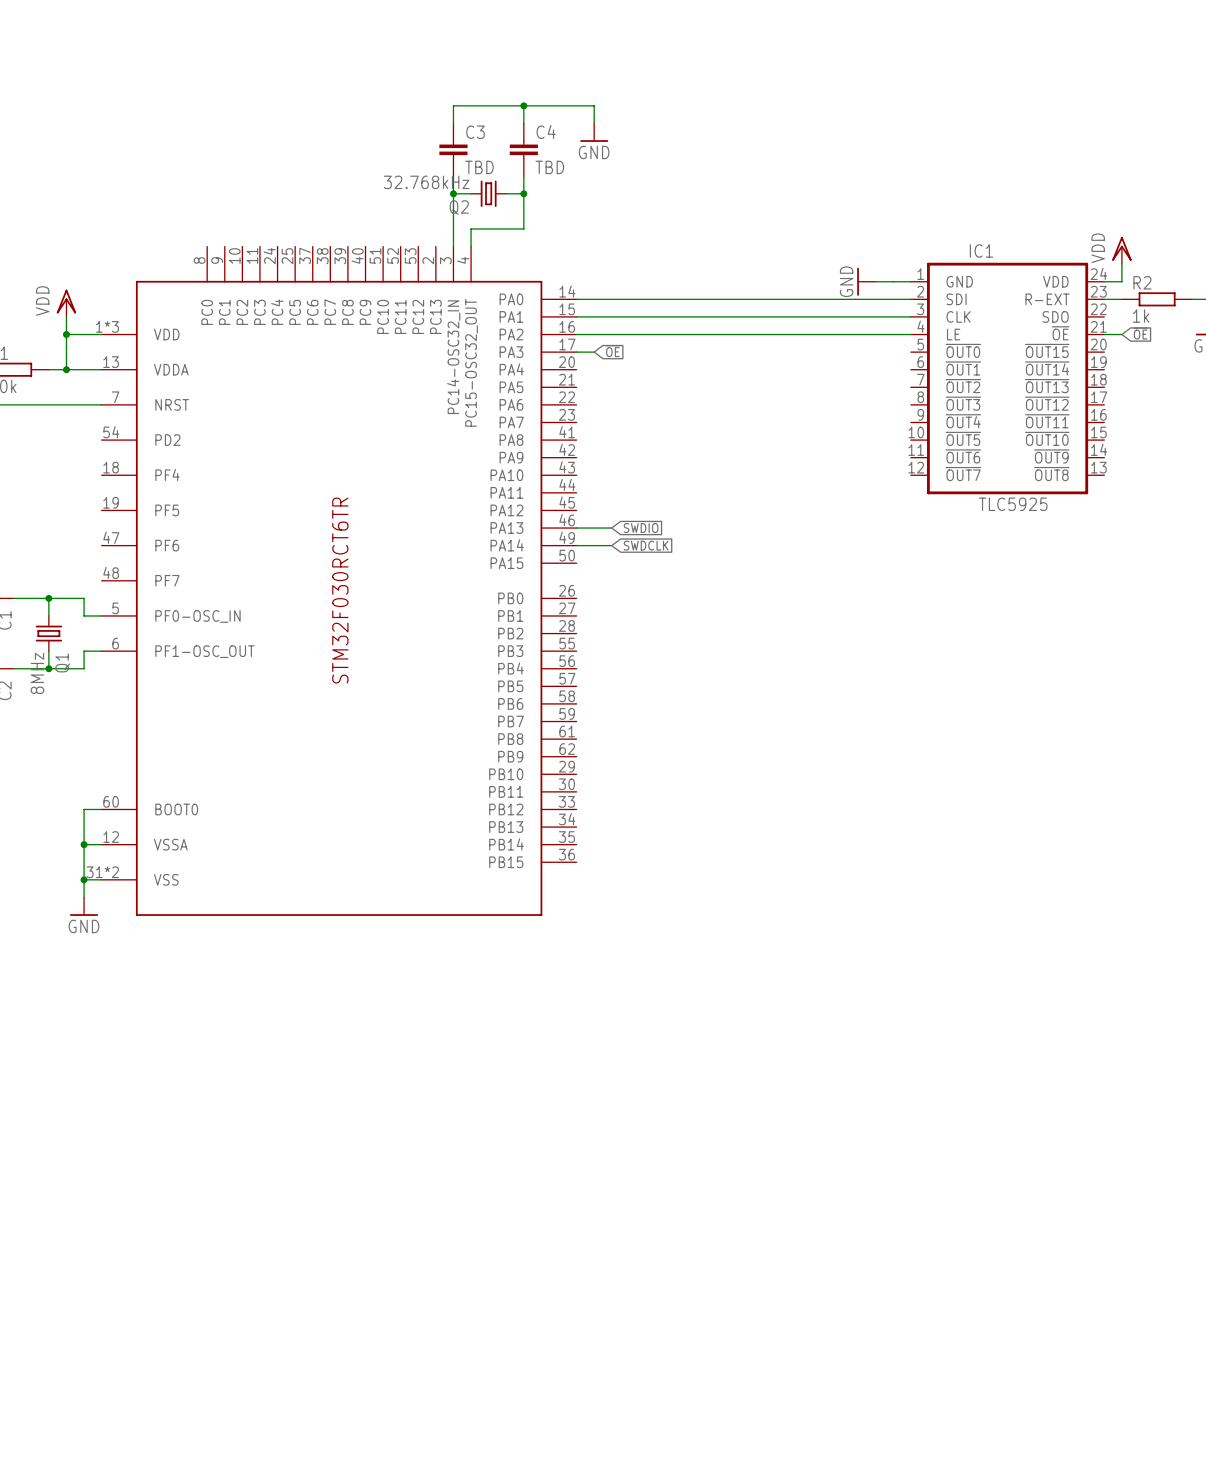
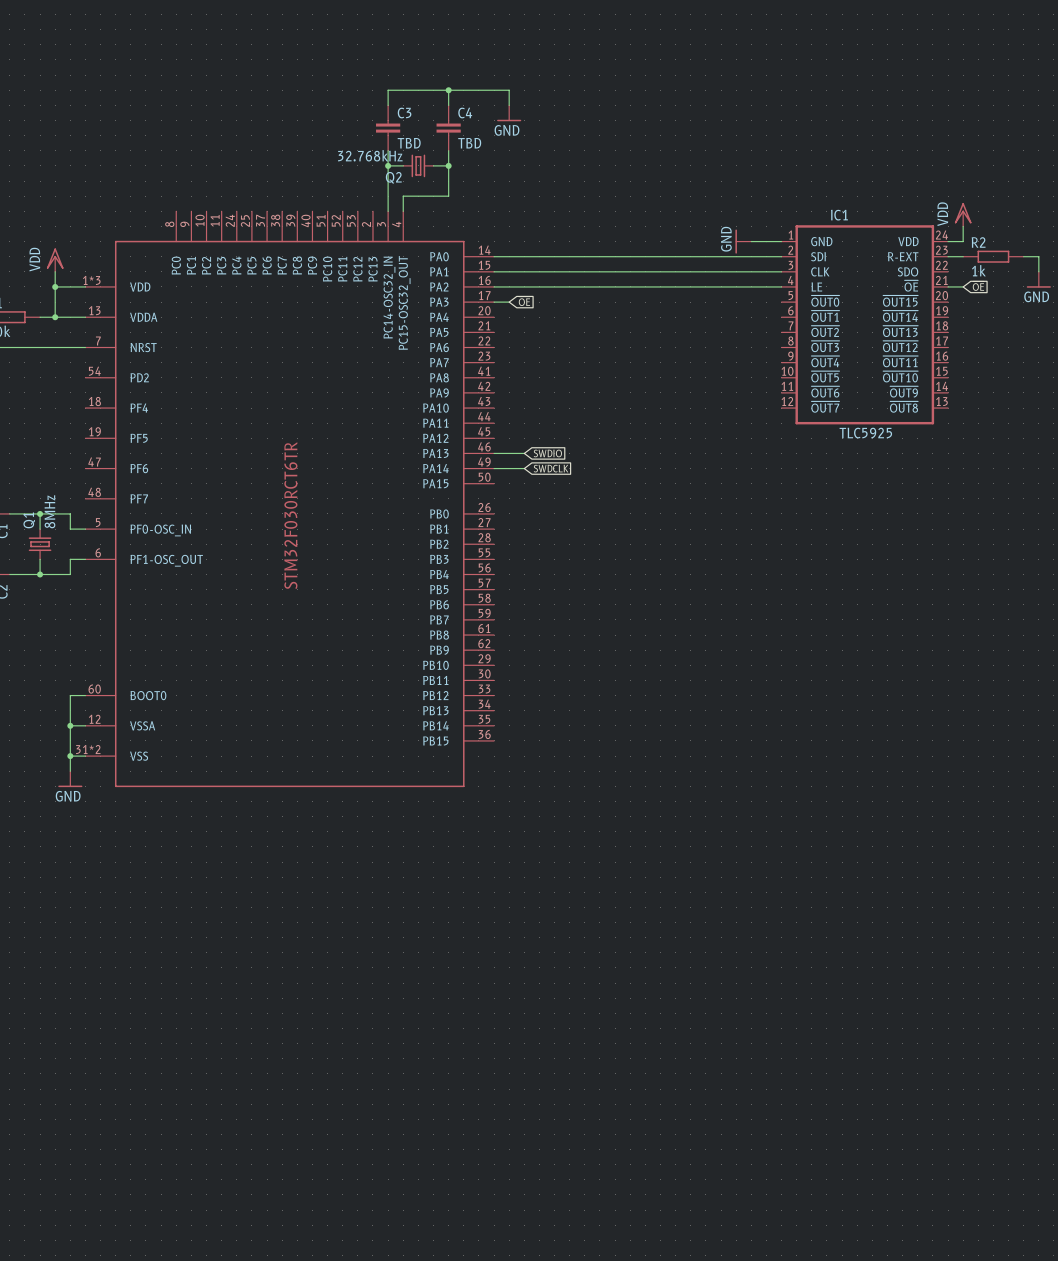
Q1 name position: Q1 (62, 662) -> Q1 (29, 520)
Q1 value position: 8MHz (37, 673) -> 8MHz (49, 511)

